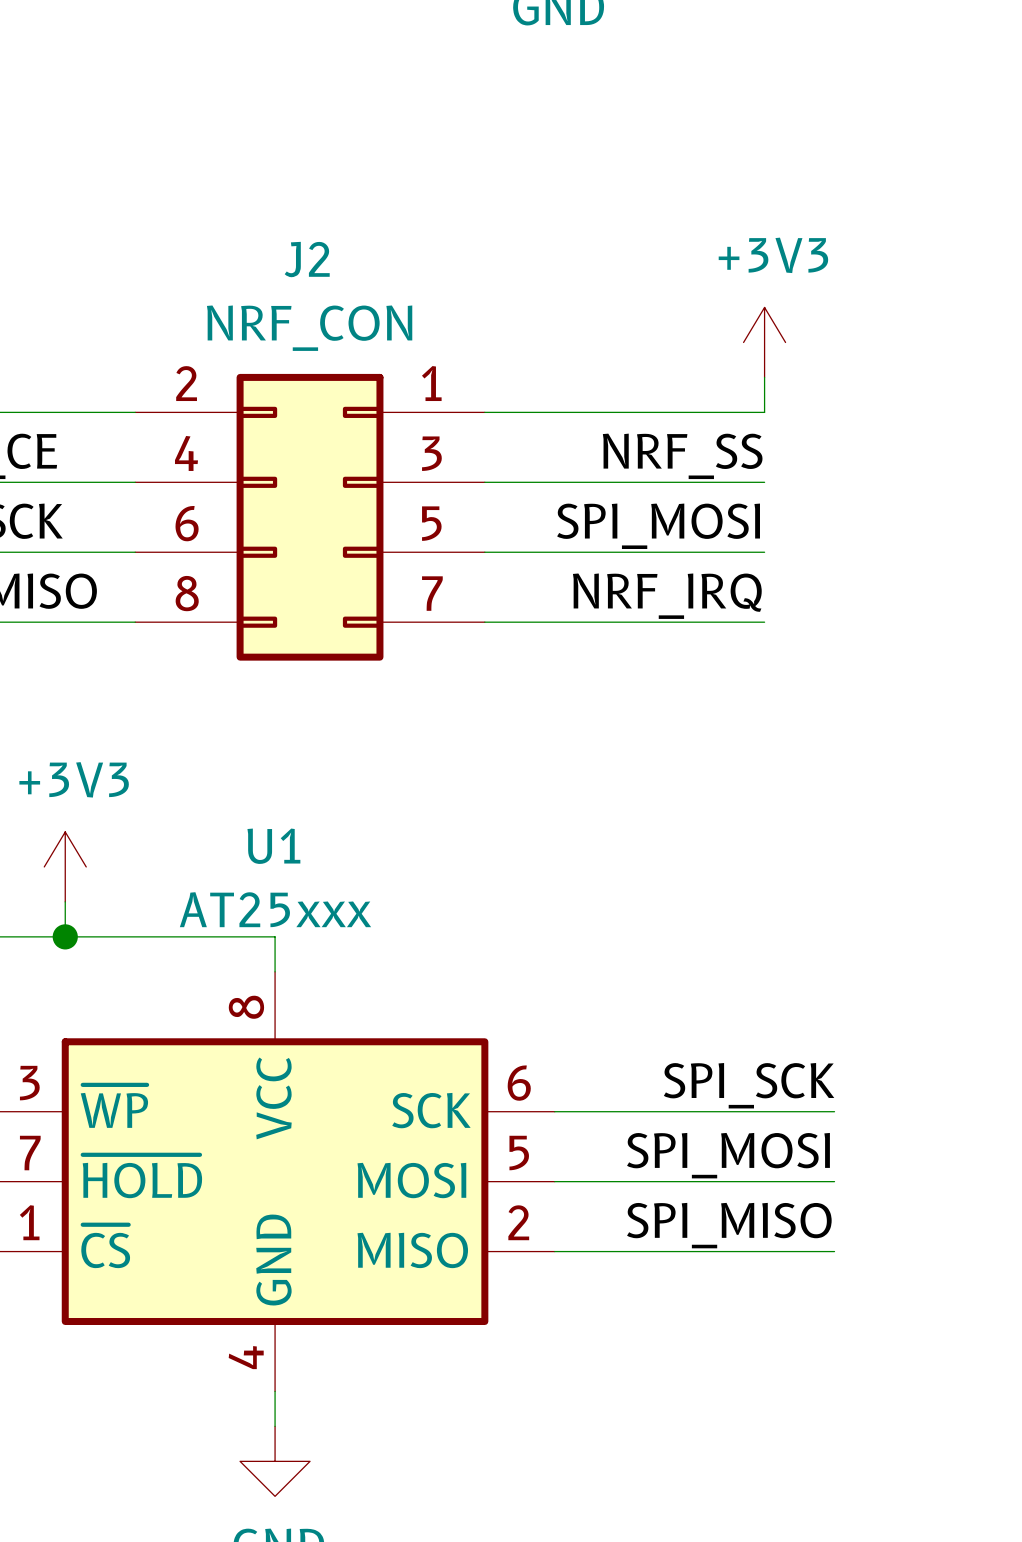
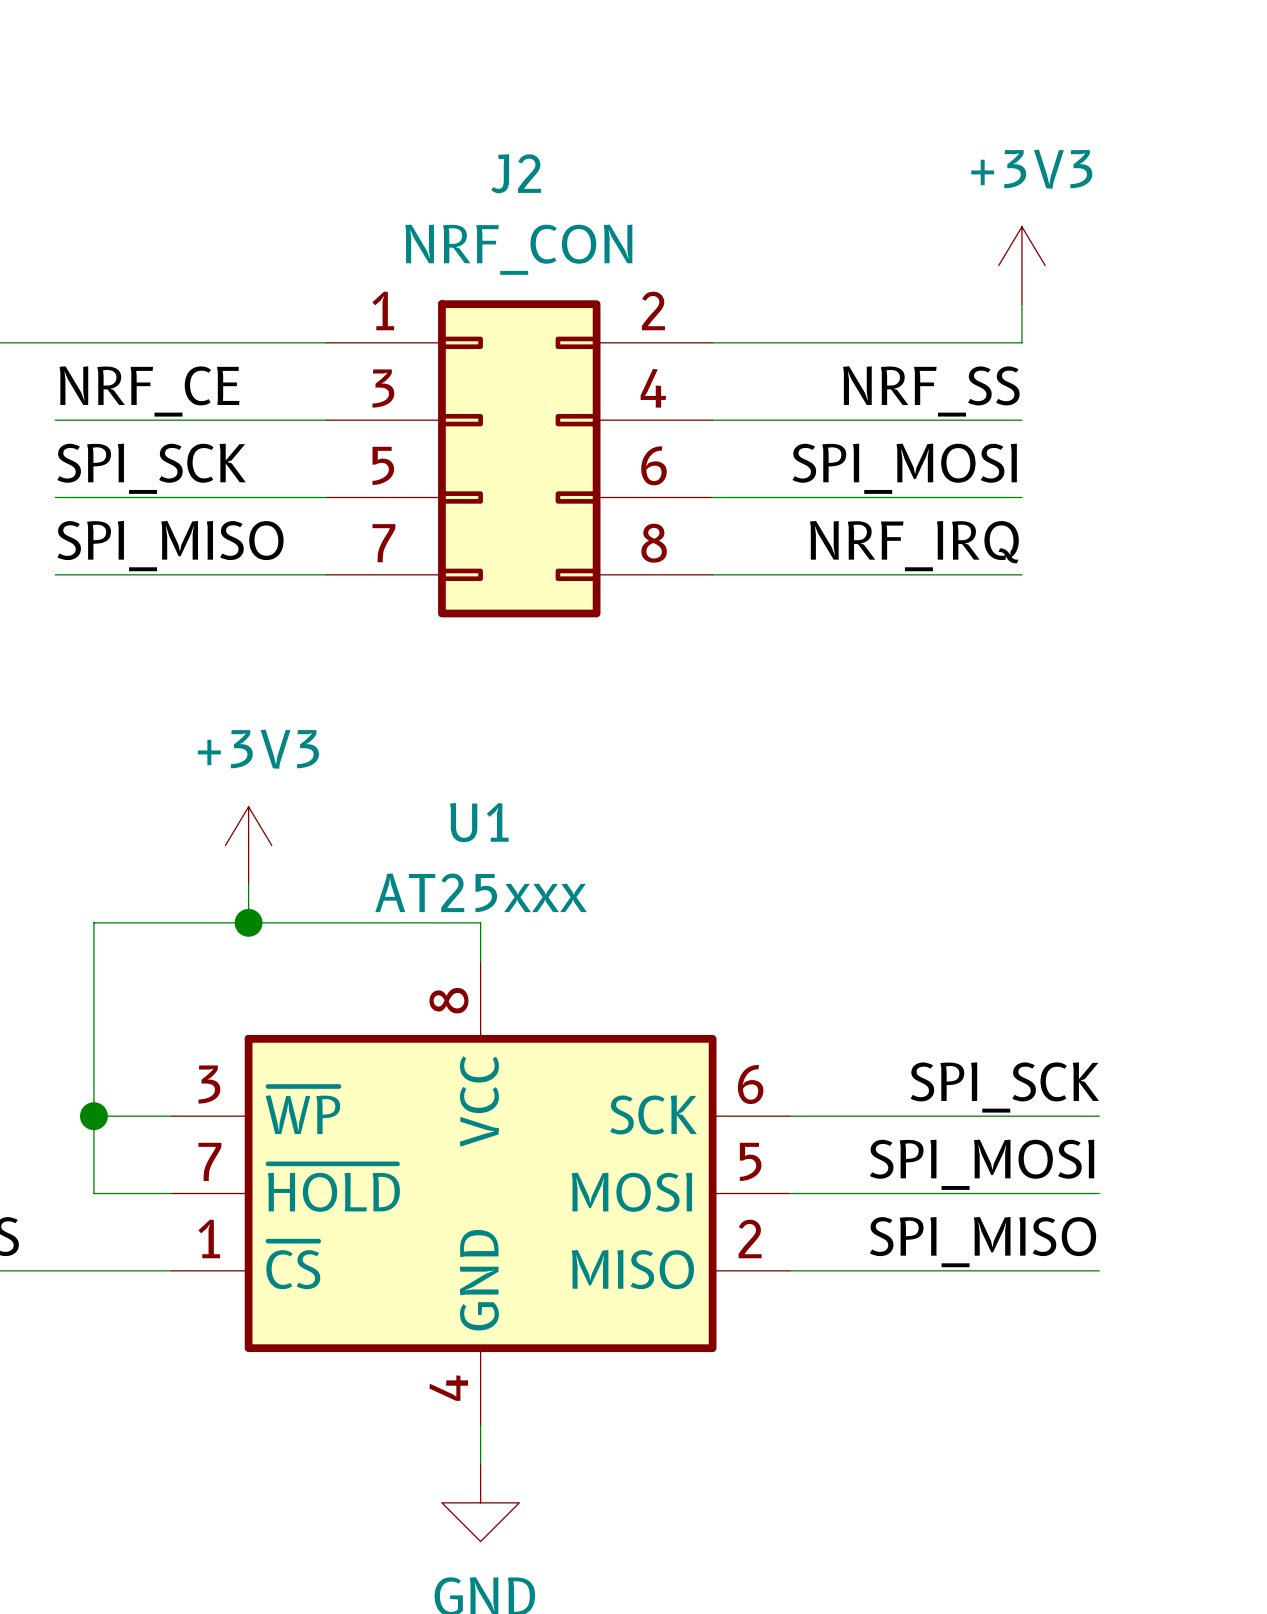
J2 flip: as is (310, 517) -> left-right (519, 458)

